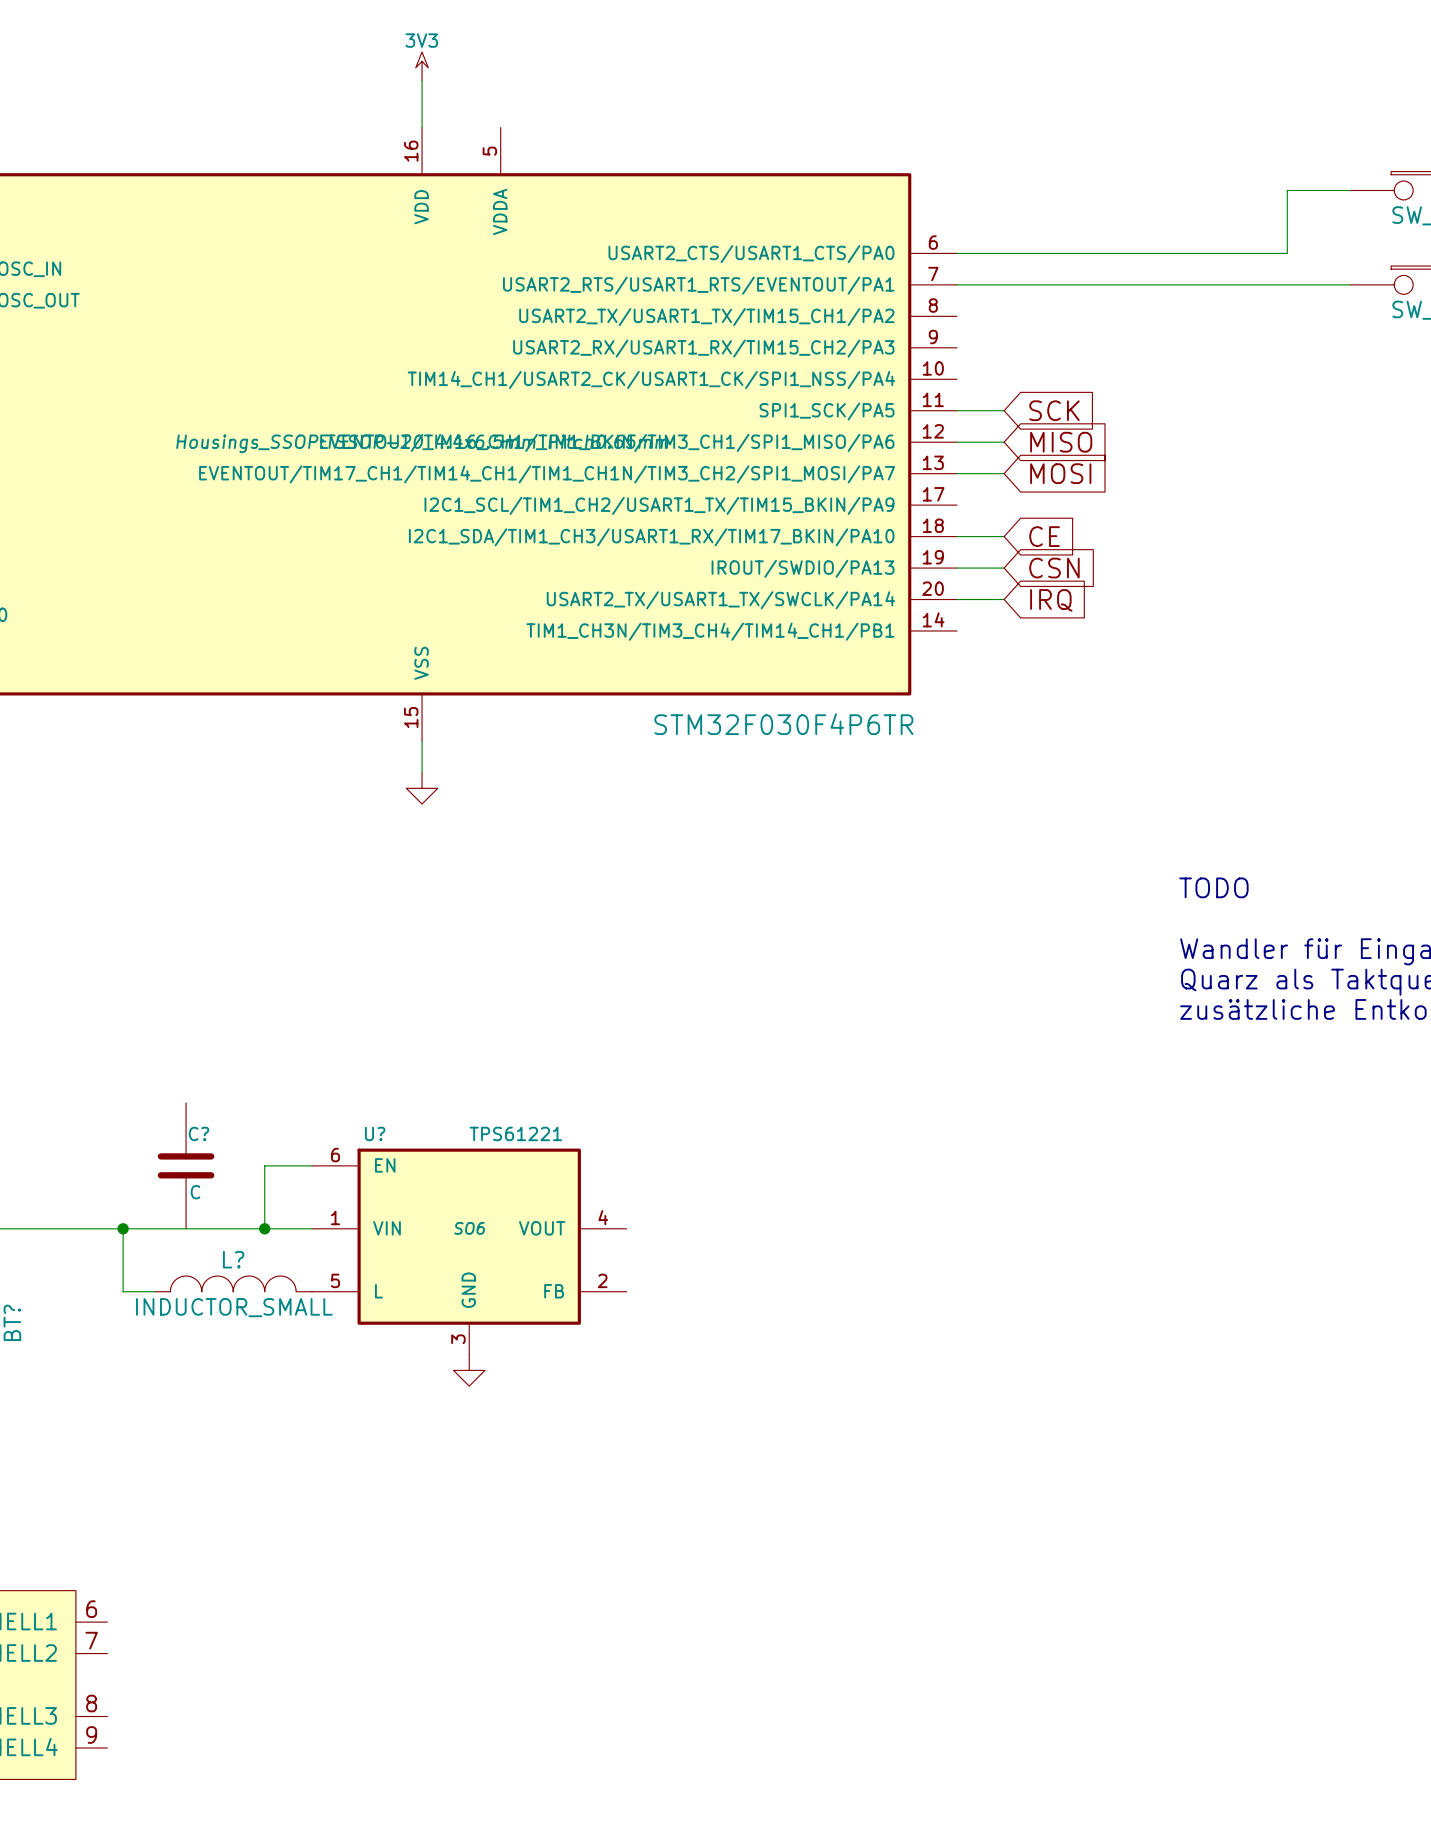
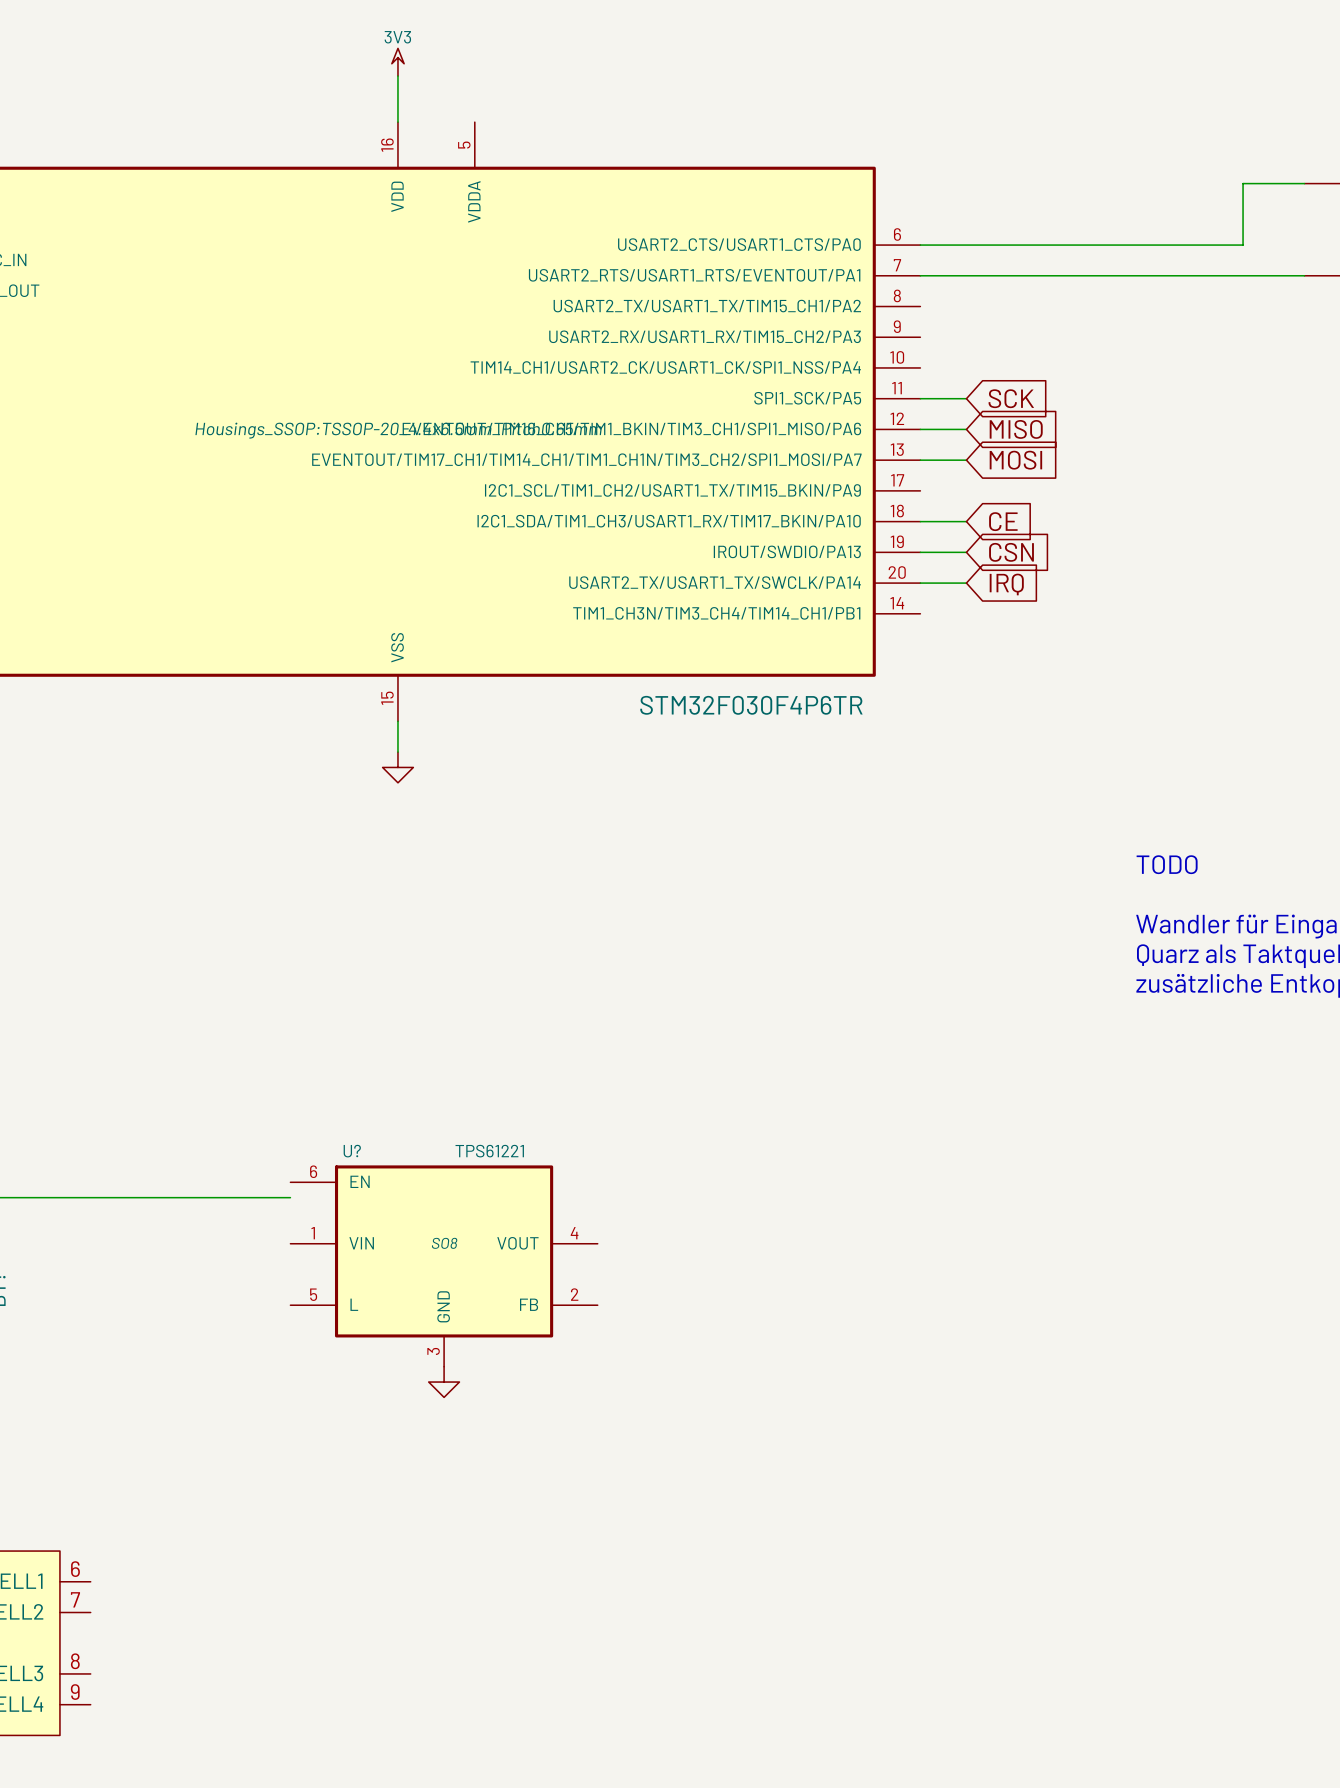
C?: C (186, 1165) -> none
wire: (311, 1165) (264, 1165) (264, 1228) -> none
wire: (123, 1228) (123, 1291) (154, 1291) -> none
junction: (123, 1228) -> none
junction: (264, 1228) -> none
U?: TPS61221 (469, 1251) -> none
L?: INDUCTOR_SMALL (233, 1283) -> none
U?: none -> TPS61221 (444, 1266)
power symbol position: (469, 1370) -> (444, 1382)

